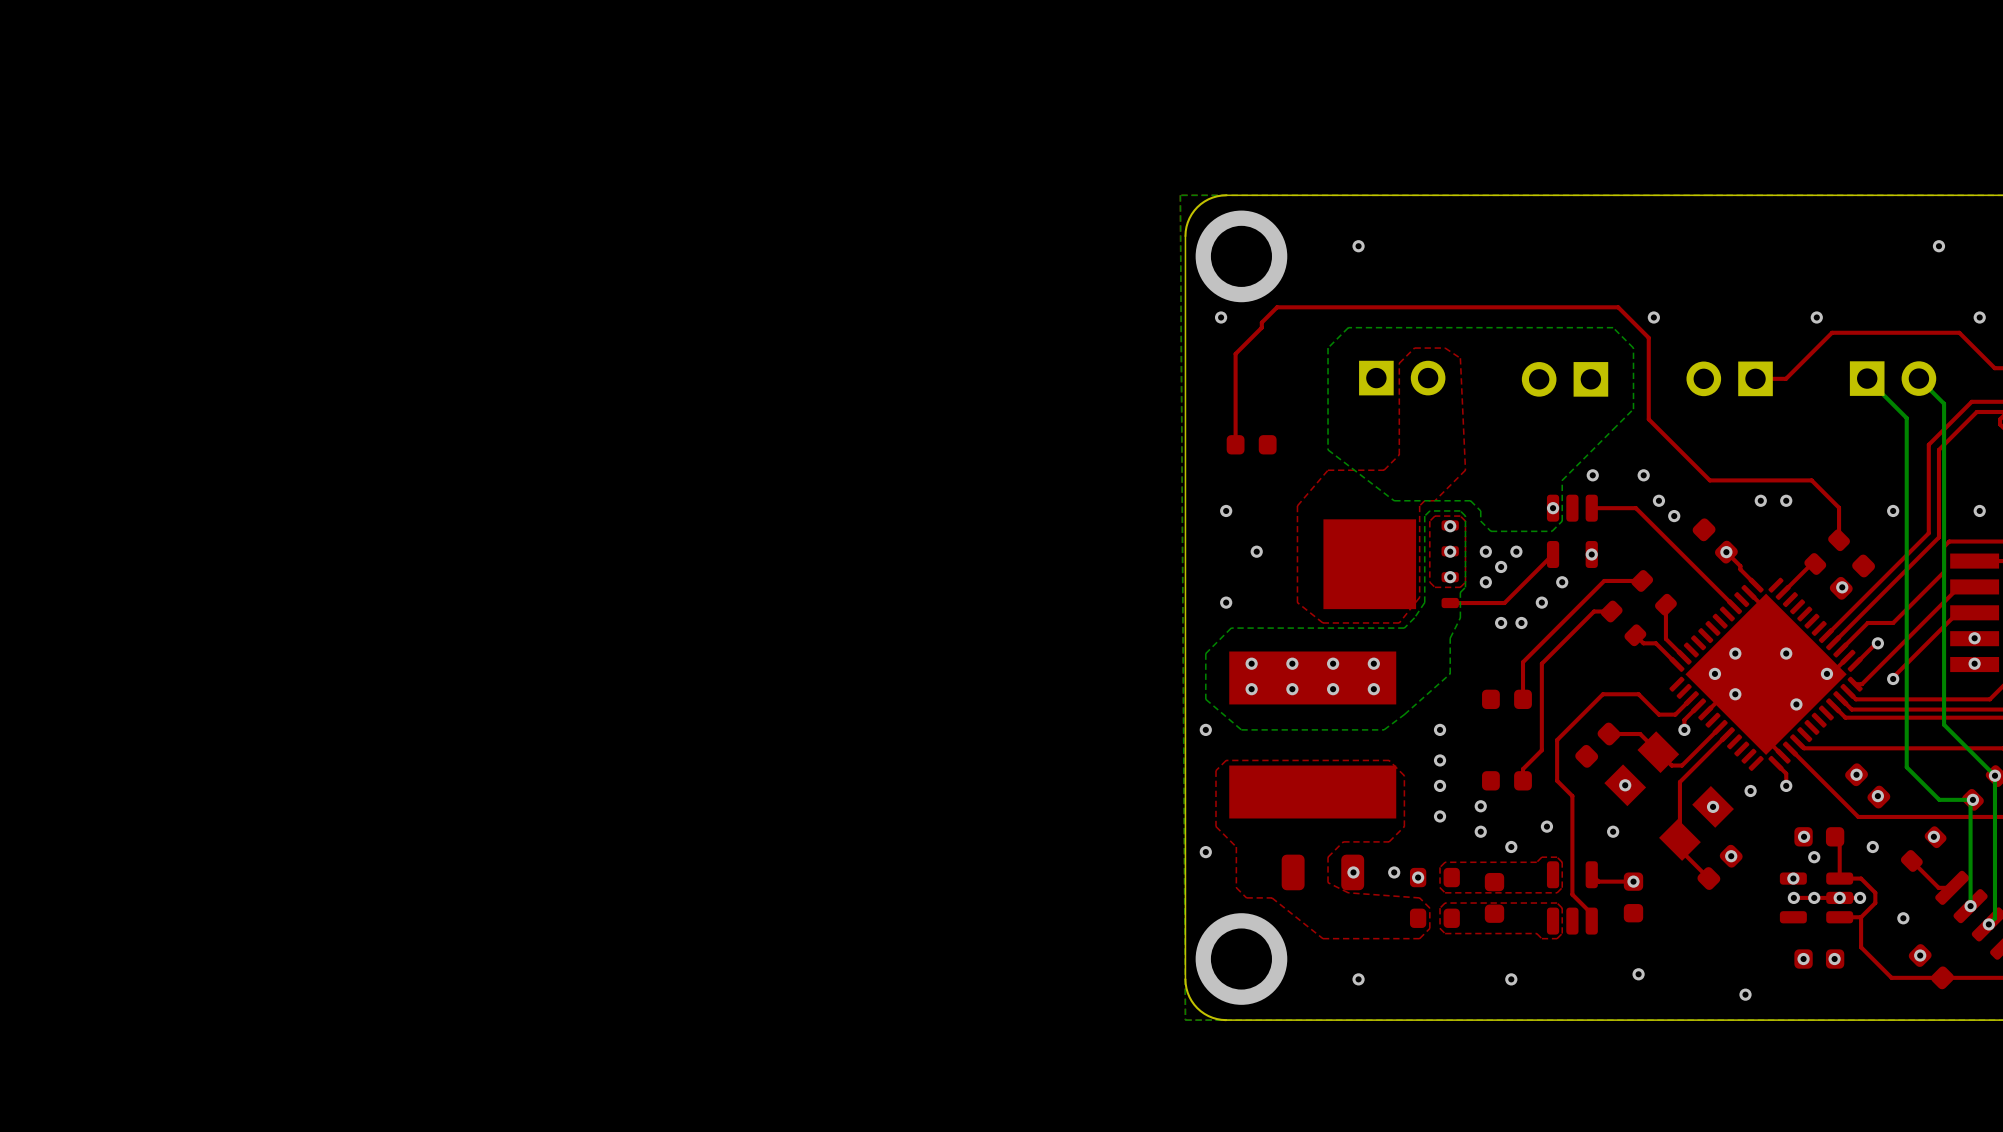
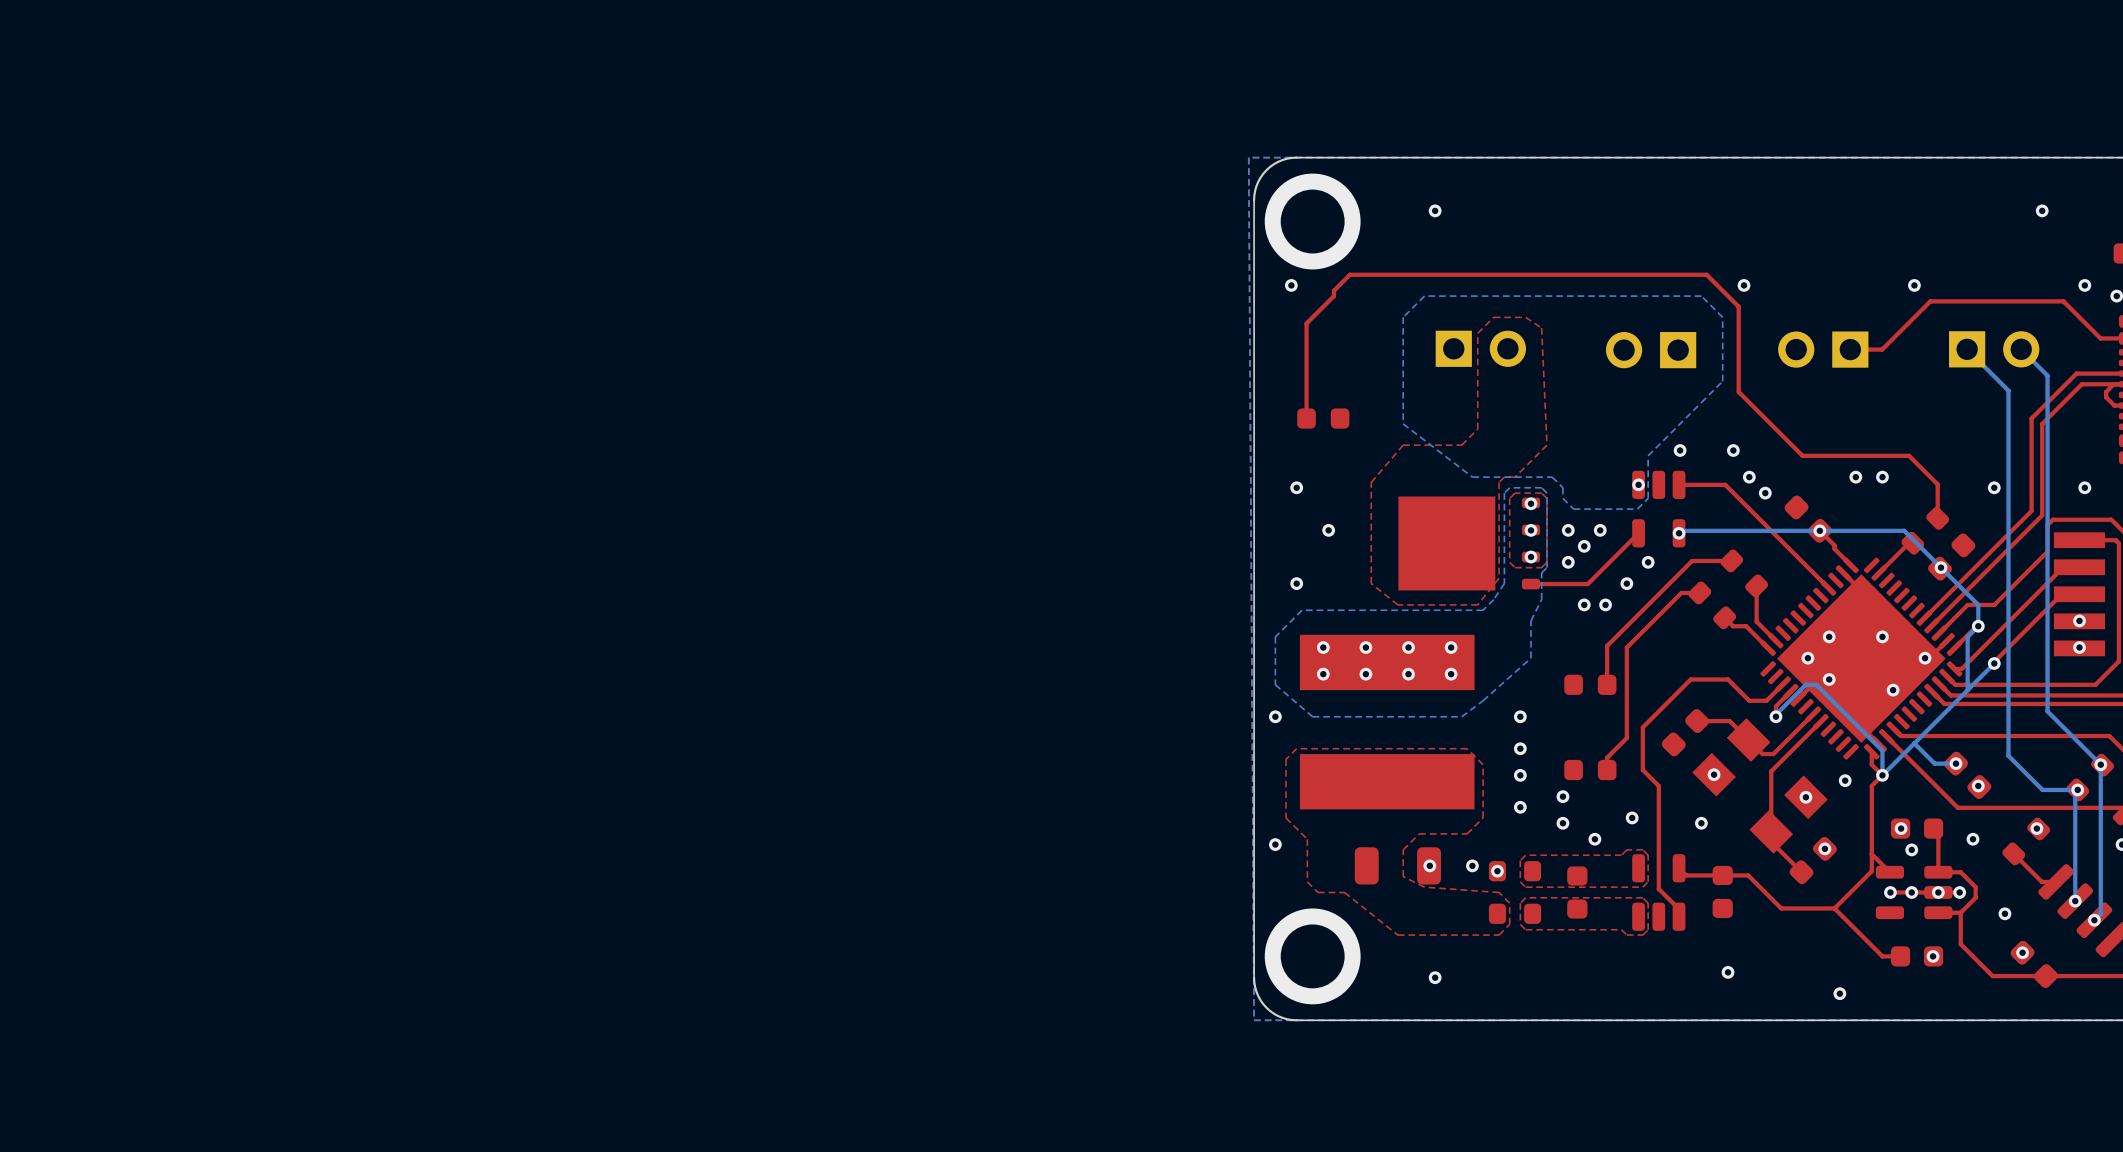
bottom track: none -> (1679, 533) (1681, 530) (1904, 530) (1978, 604) (1978, 626) (1967, 636) (1967, 690)
bottom track: none -> (1994, 663) (1882, 775) (1882, 750) (1816, 684) (1805, 684) (1775, 716)
bottom track: none -> (1914, 743) (1934, 763) (1955, 763)
top track: (1775, 763) (1786, 773) (1786, 785) -> (1871, 751) (1871, 764) (1882, 775) (1871, 785) (1871, 871) (1834, 908)
top track: none -> (1871, 854) (1889, 872)
via: (1793, 878) -> none
top track: none -> (1722, 875) (1748, 875) (1781, 908) (1834, 908)
via: (1633, 881) -> none
top track: none -> (1834, 908) (1882, 956) (1900, 956)
via: (1803, 959) -> none
via: (1511, 979) -> none

